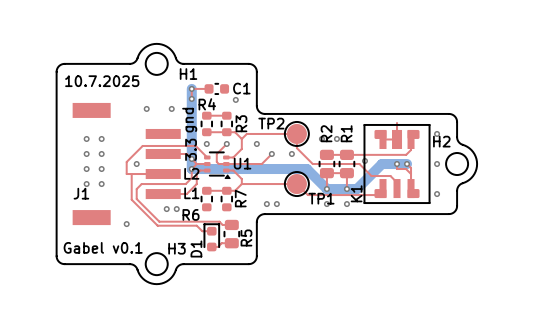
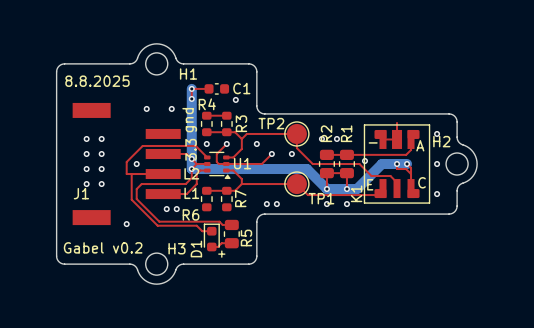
text: 10.7.2025 (102, 81) -> 8.8.2025 (97, 81)
text: none -> - (373, 142)
text: none -> A (420, 145)
text: none -> C (422, 182)
text: none -> E (370, 184)
text: Gabel v0.1 (103, 247) -> Gabel v0.2 (103, 247)
line: none -> (221, 251) (221, 257)
line: none -> (218, 254) (224, 254)

